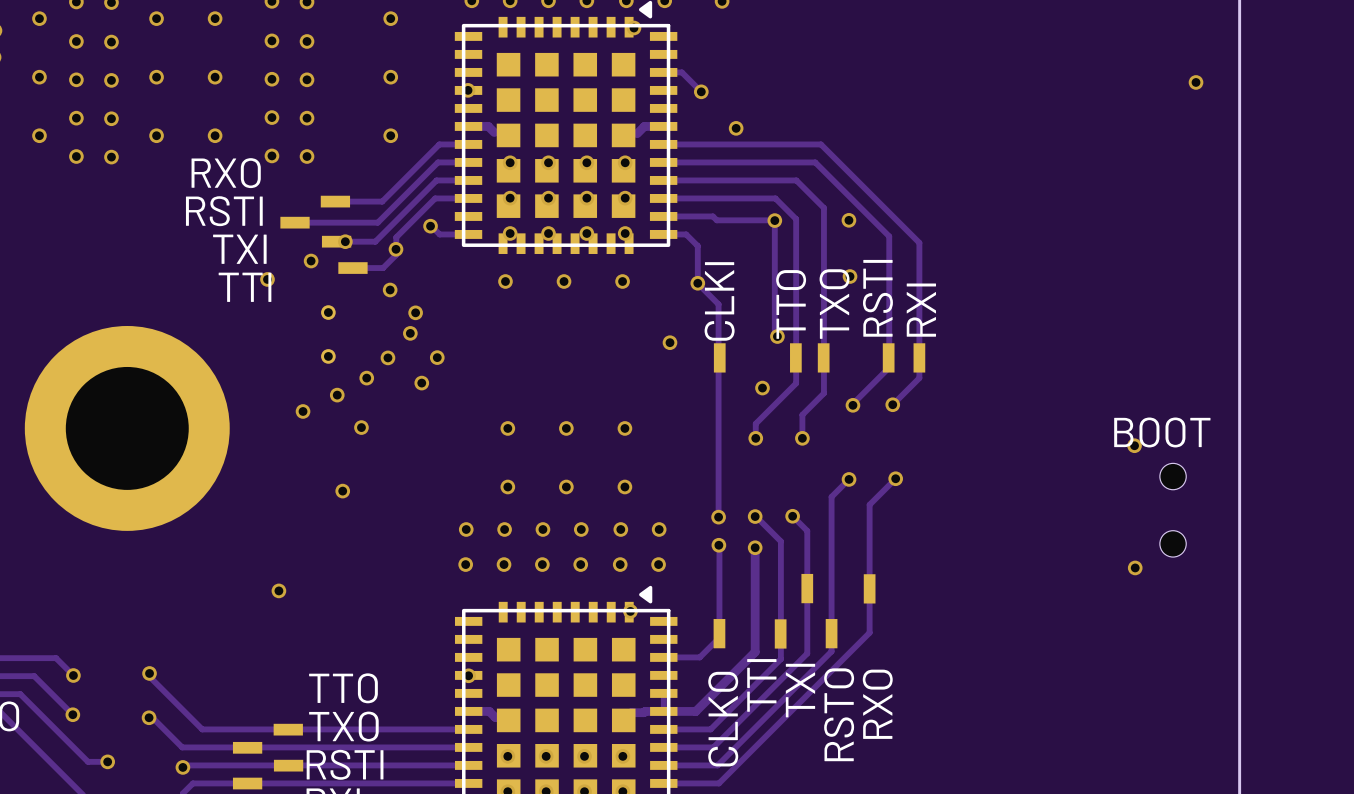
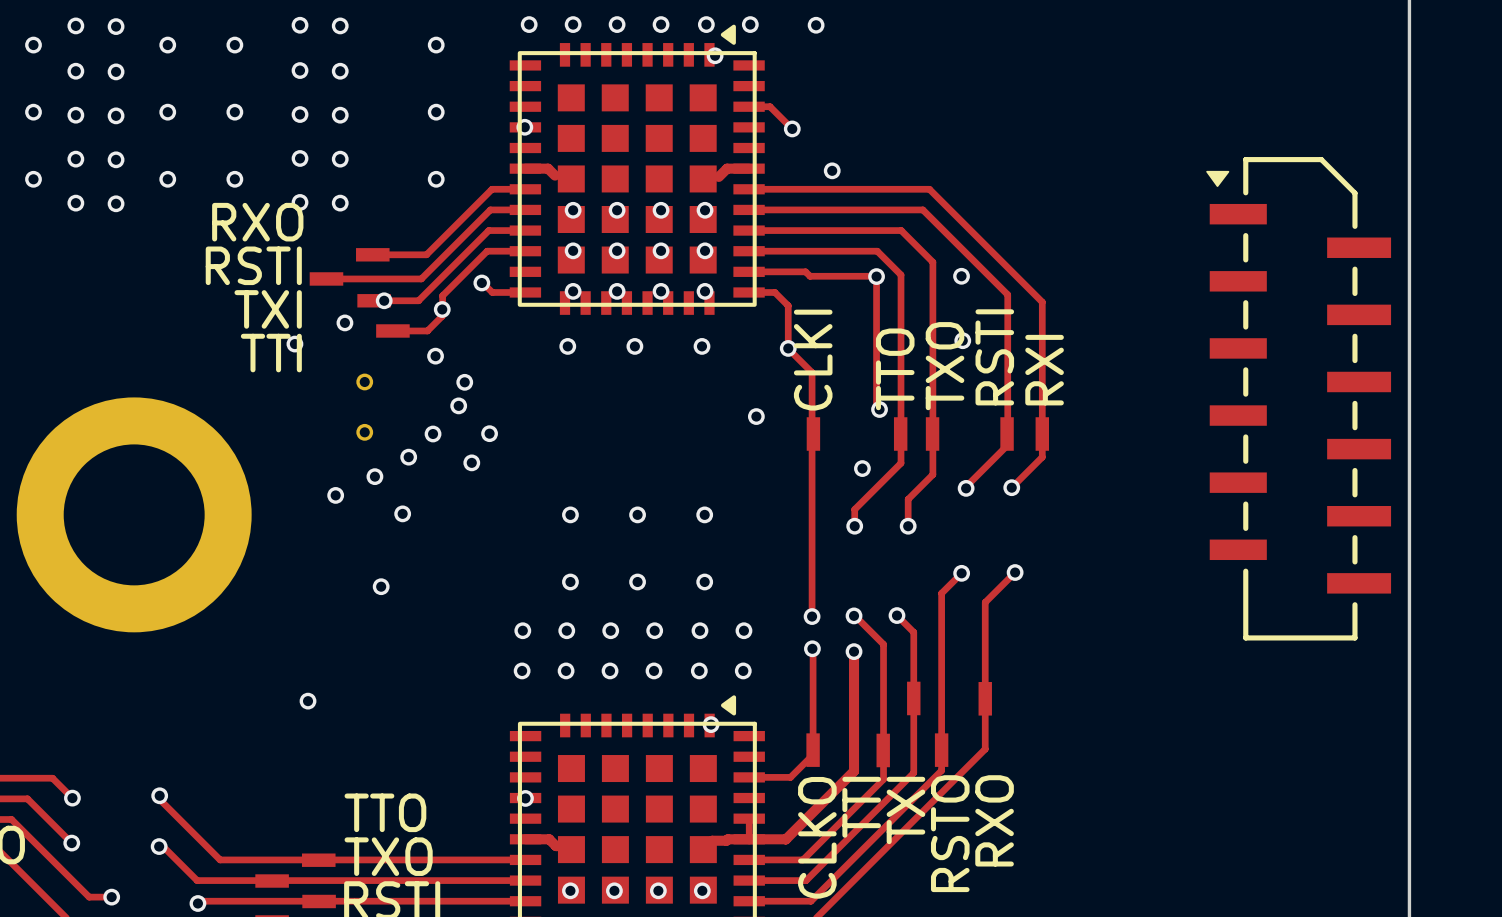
via: (1196, 82) -> none
part: none -> (1298, 398)
text: BOOT (1162, 432) -> none
via: (1134, 445) -> none
part: (1173, 510) -> none
via: (1135, 567) -> none

